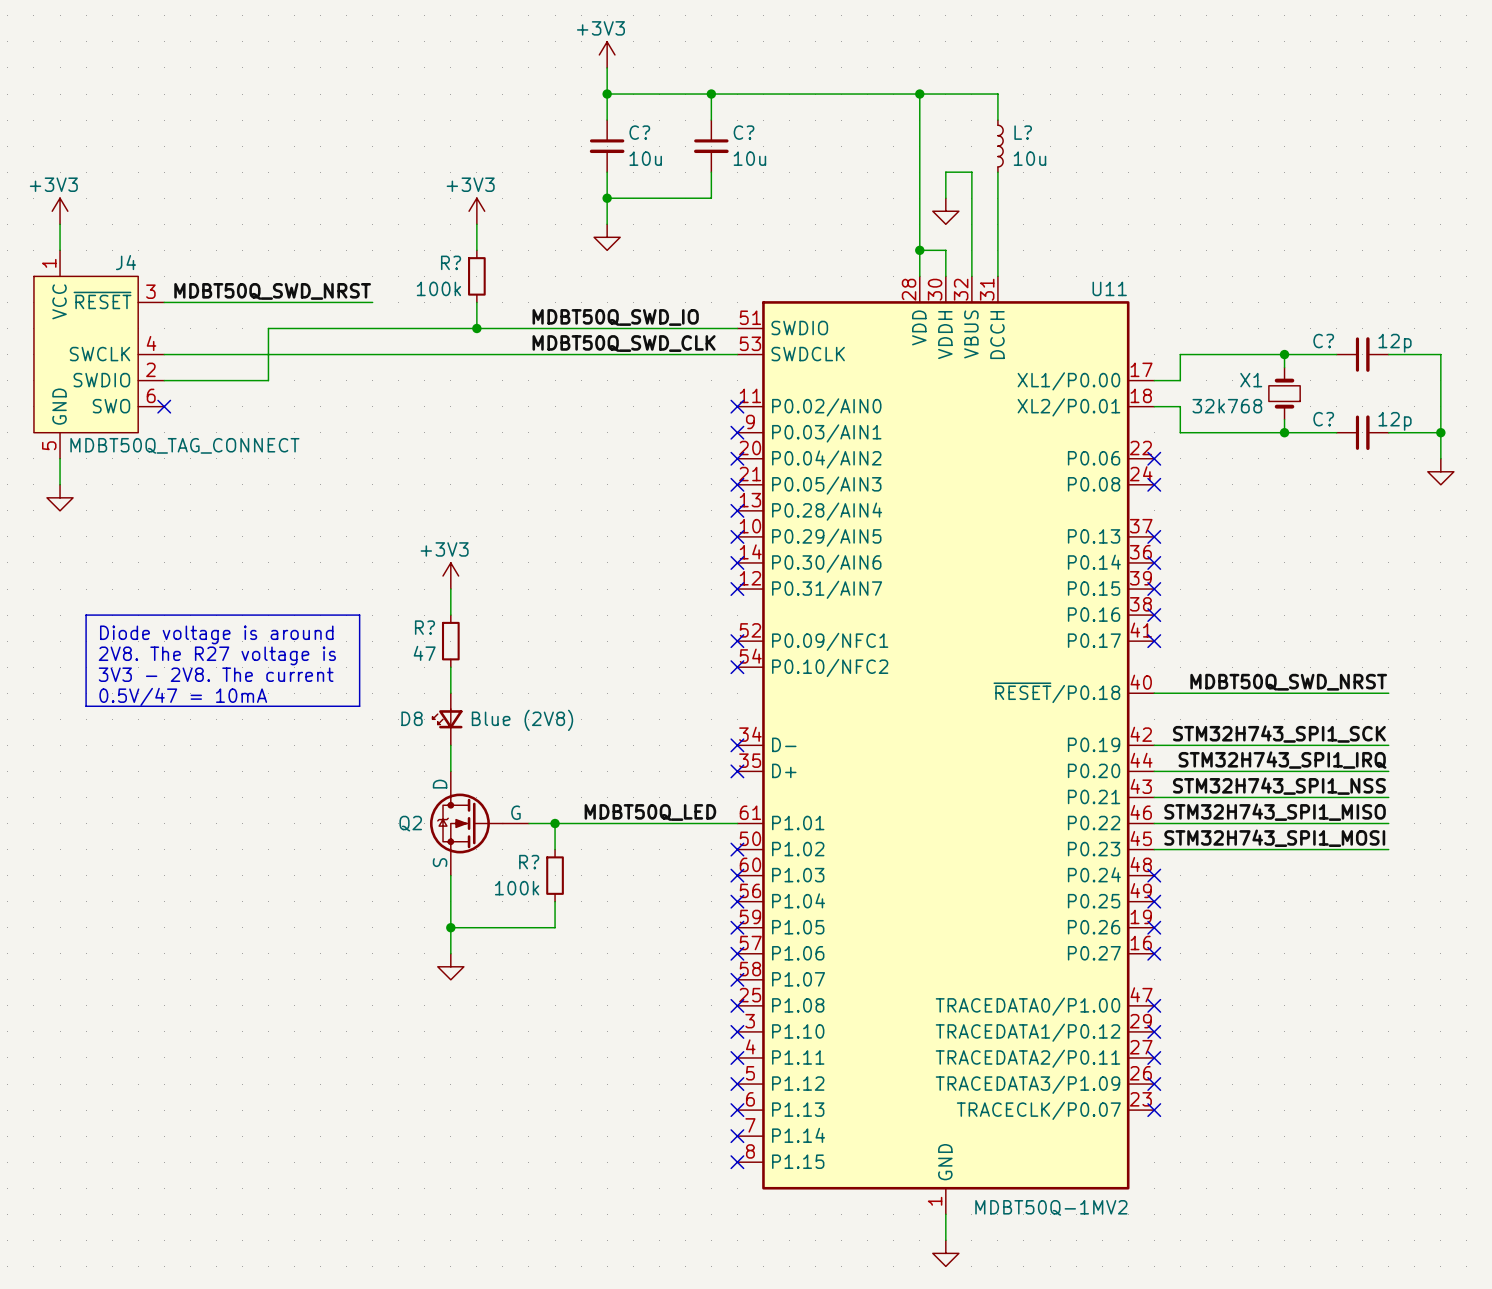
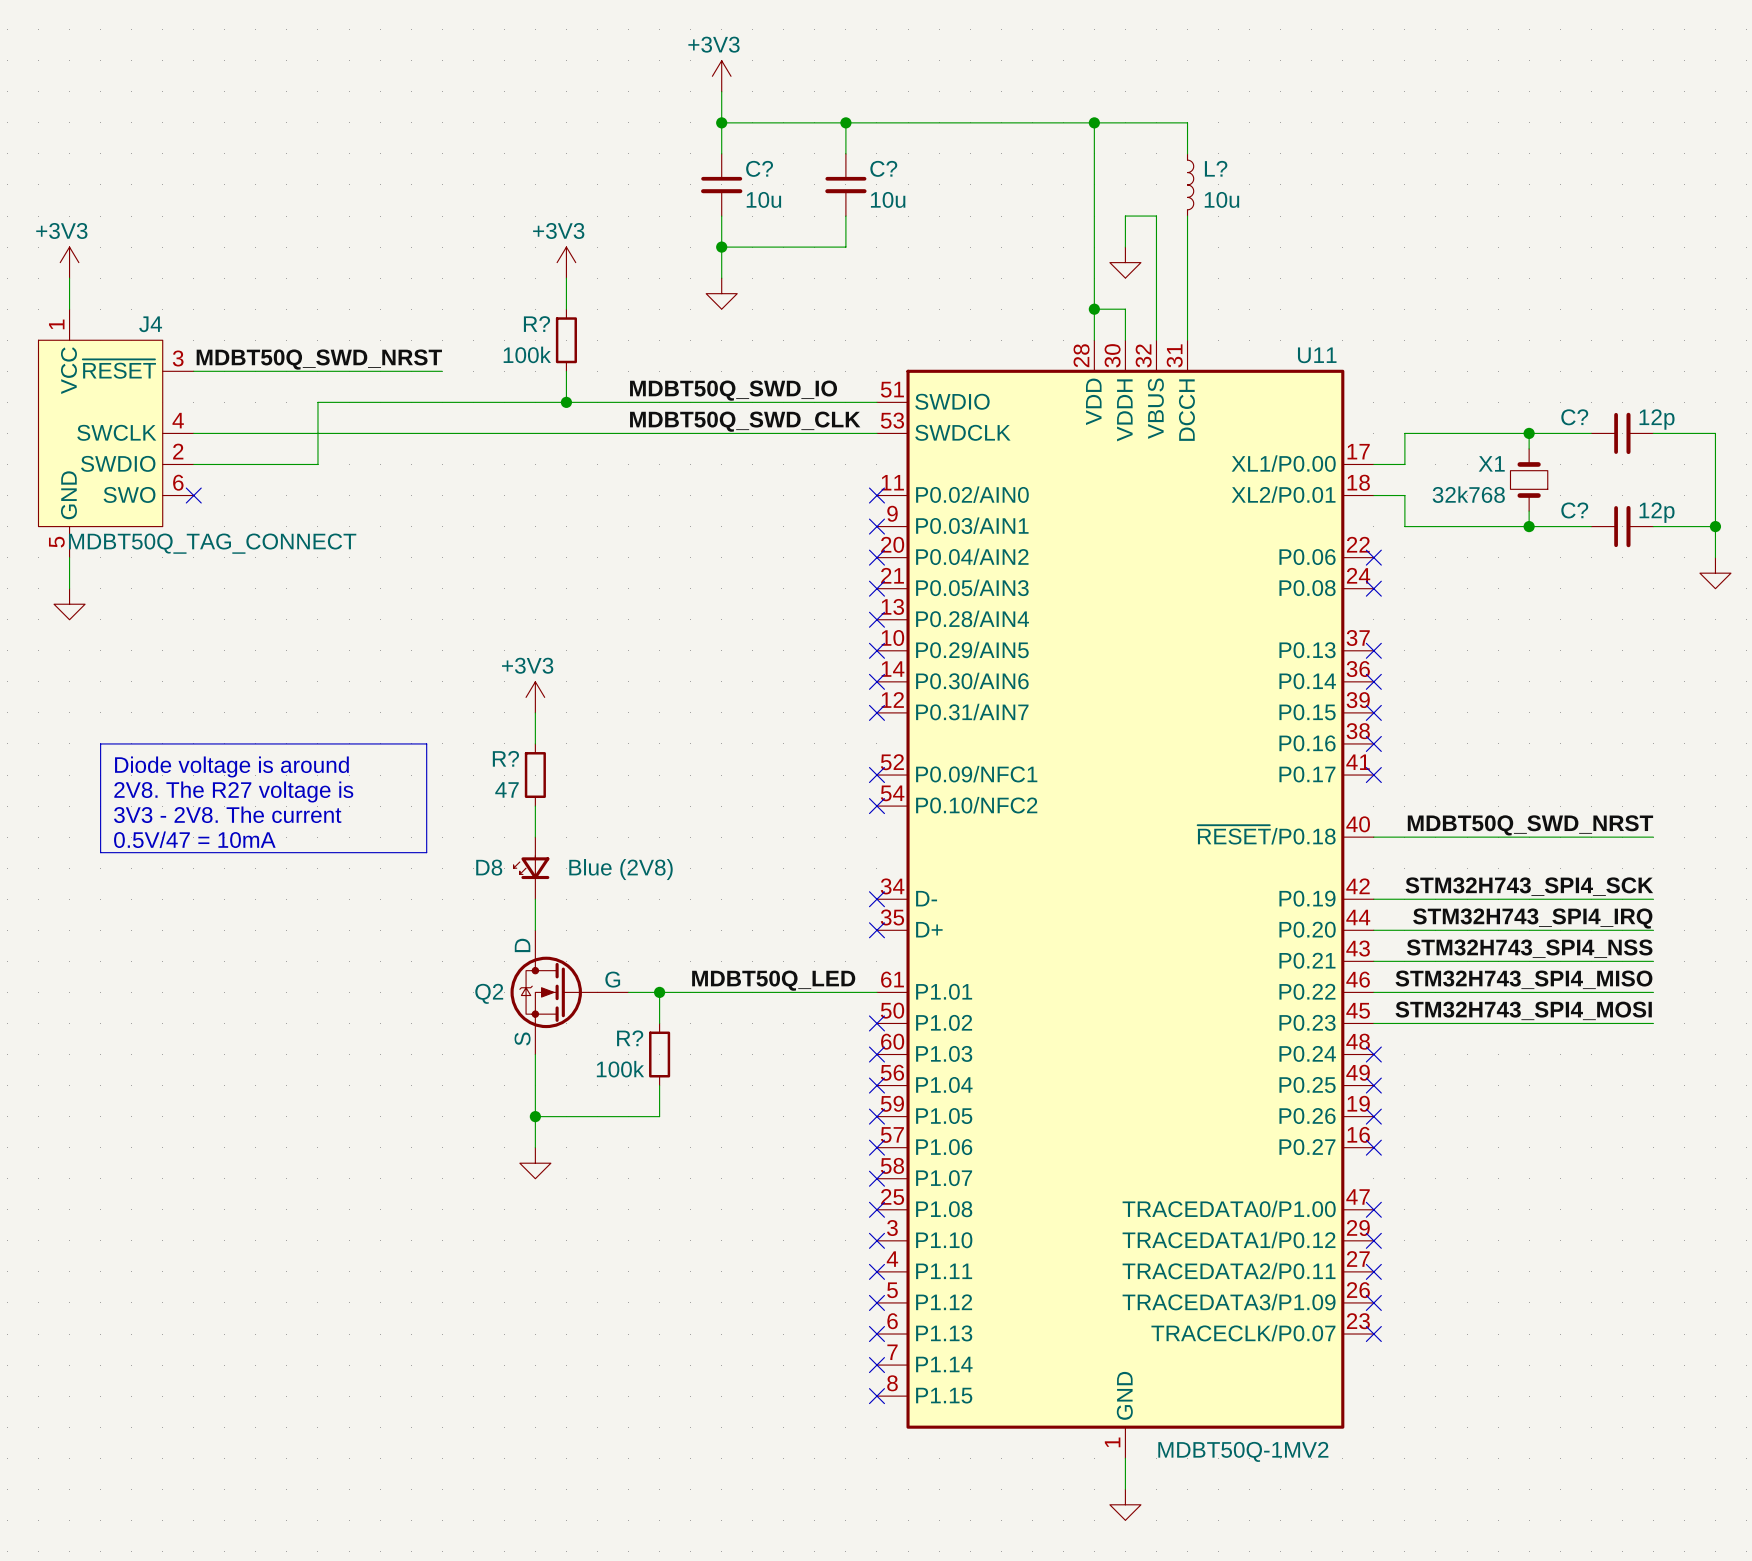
label: STM32H743_SPI1_SCK (1279, 734) -> STM32H743_SPI4_SCK (1529, 886)
label: STM32H743_SPI1_IRQ (1282, 760) -> STM32H743_SPI4_IRQ (1532, 918)
label: STM32H743_SPI1_NSS (1279, 786) -> STM32H743_SPI4_NSS (1529, 948)
label: STM32H743_SPI1_MISO (1275, 812) -> STM32H743_SPI4_MISO (1523, 979)
label: STM32H743_SPI1_MOSI (1274, 838) -> STM32H743_SPI4_MOSI (1523, 1010)

